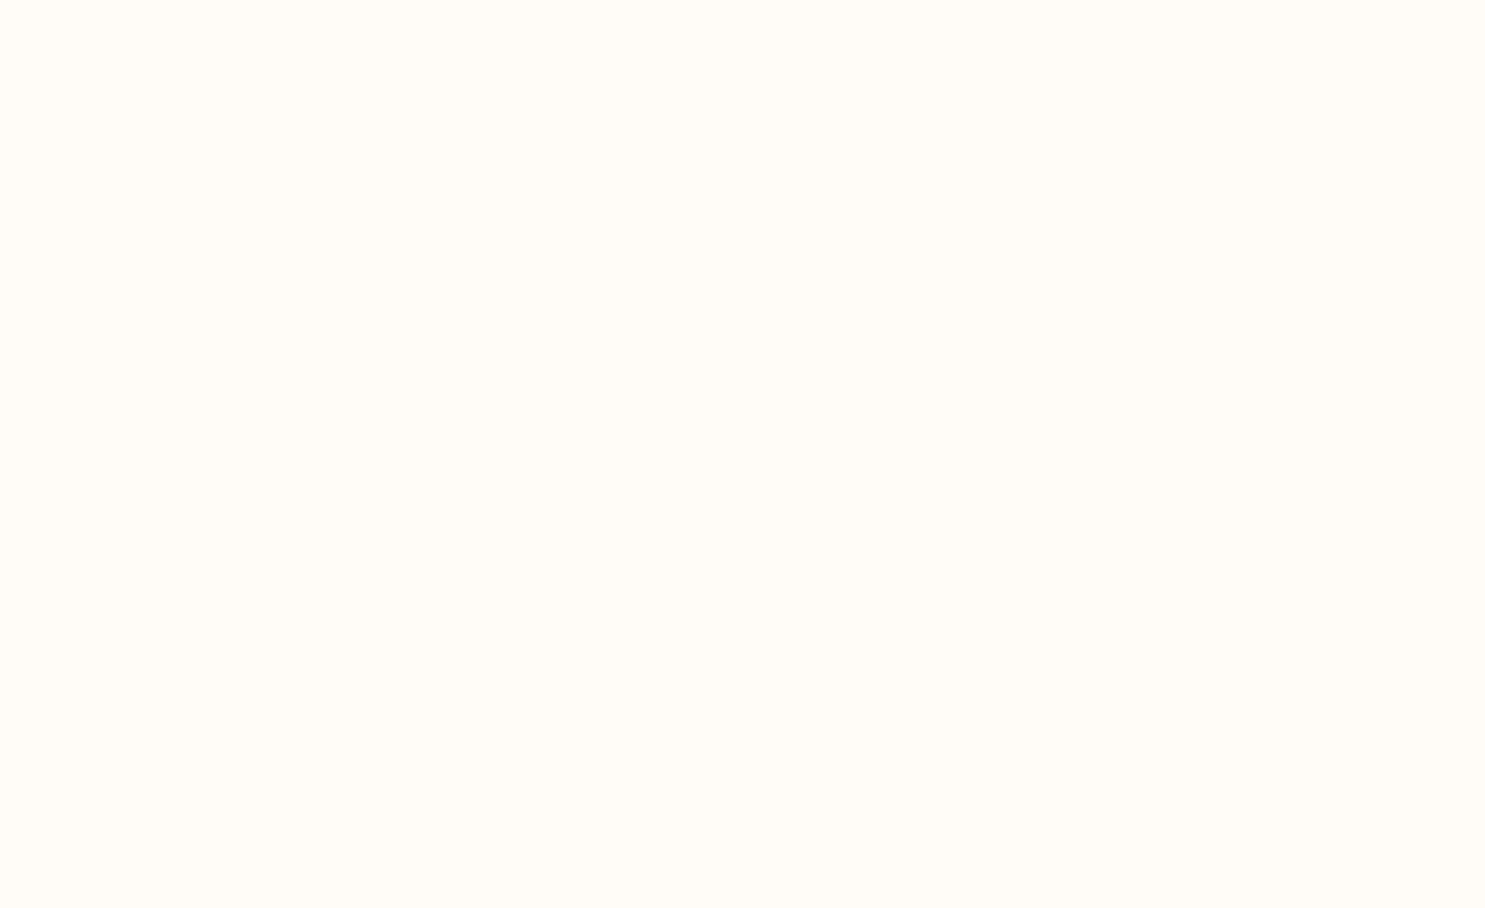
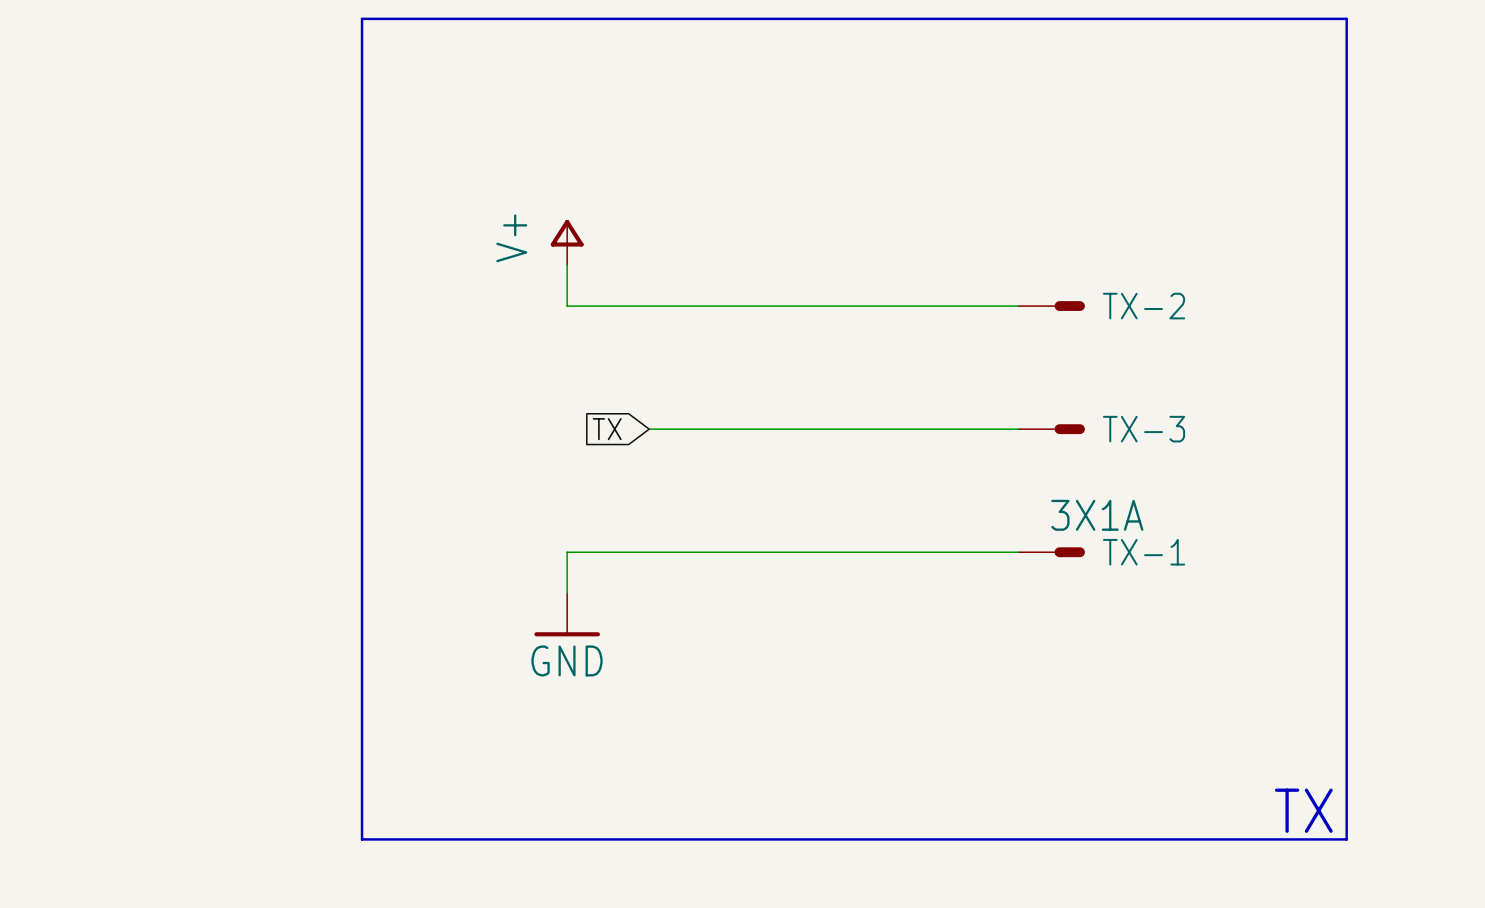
line: none -> (362, 18) (1346, 18) (1346, 839) (362, 839) (362, 18)
power symbol: none -> V+ (567, 242)
wire: none -> (567, 265) (567, 306) (1018, 306)
TX-2: none -> (1051, 306)
global label: none -> TX (607, 429)
wire: none -> (649, 429) (1018, 429)
TX-3: none -> (1051, 429)
wire: none -> (1018, 552) (567, 552) (567, 593)
TX-1: none -> 3X1A (1051, 552)
power symbol: none -> GND (567, 614)
text: none -> TX (1303, 810)

